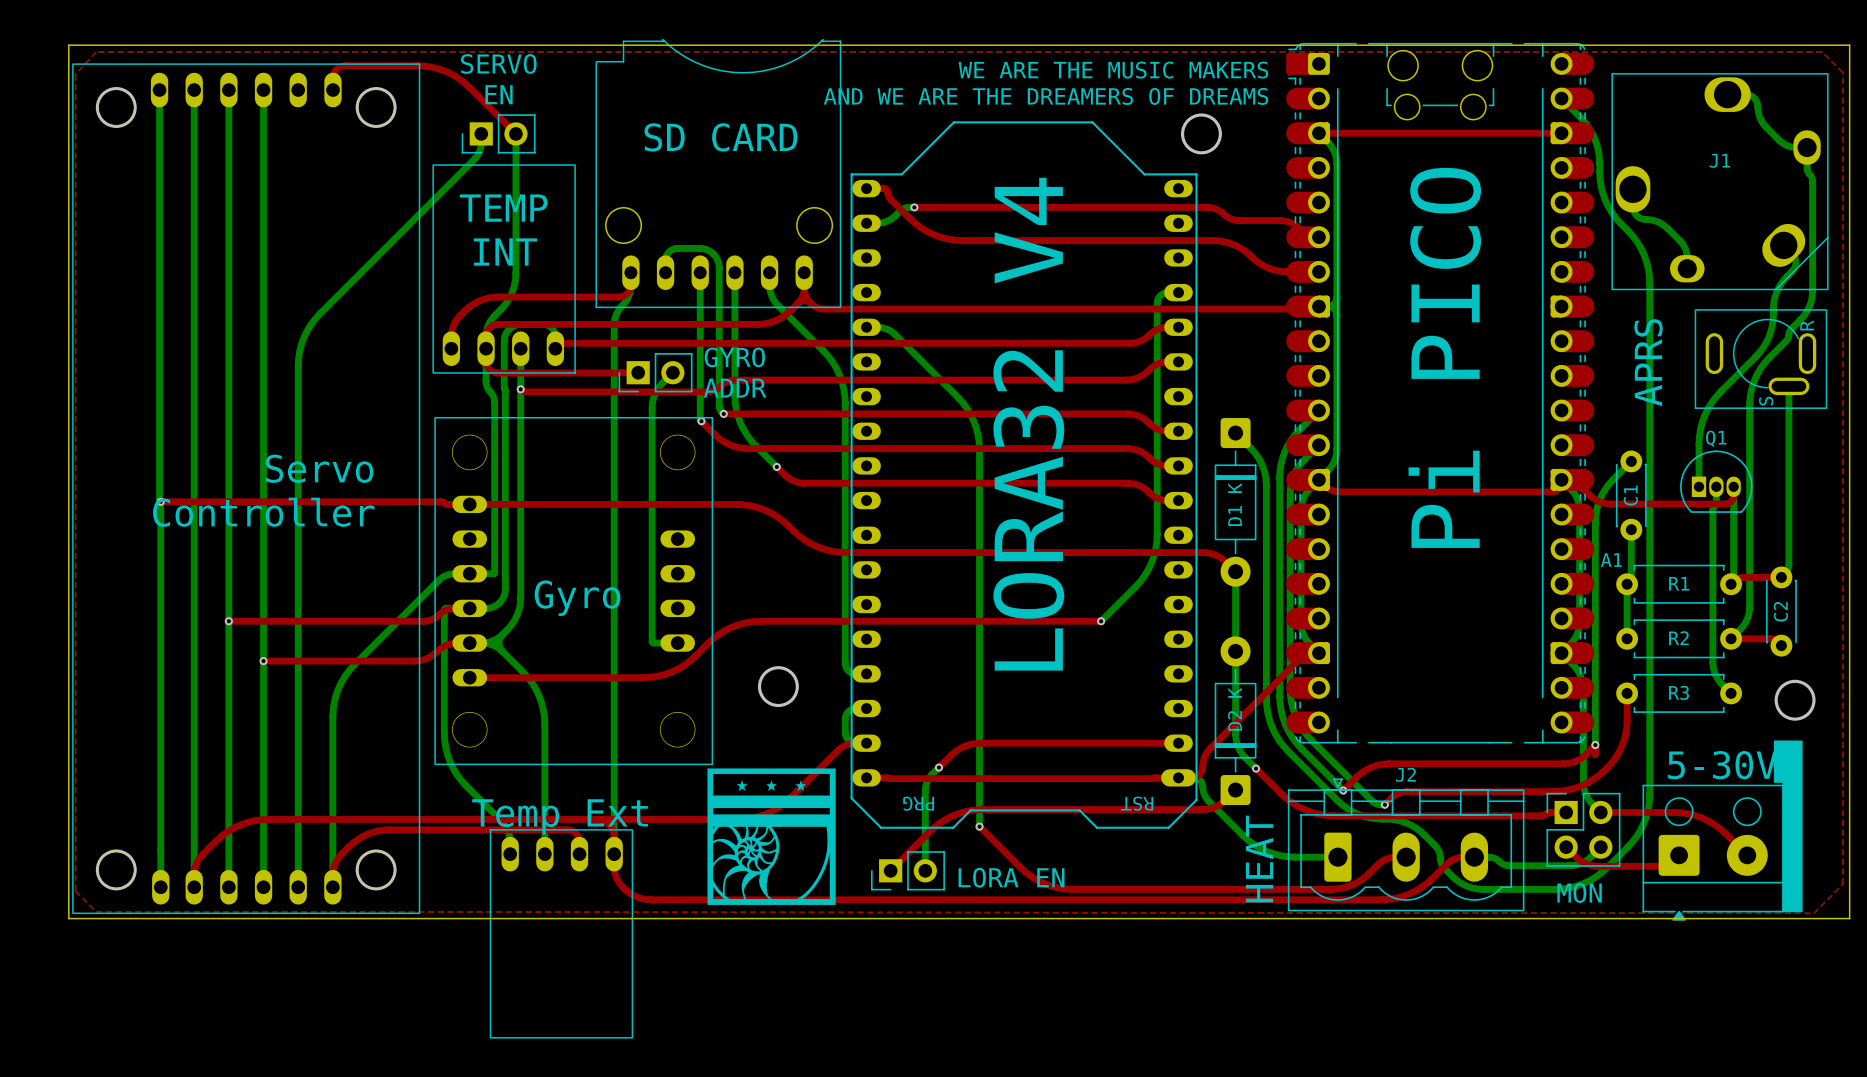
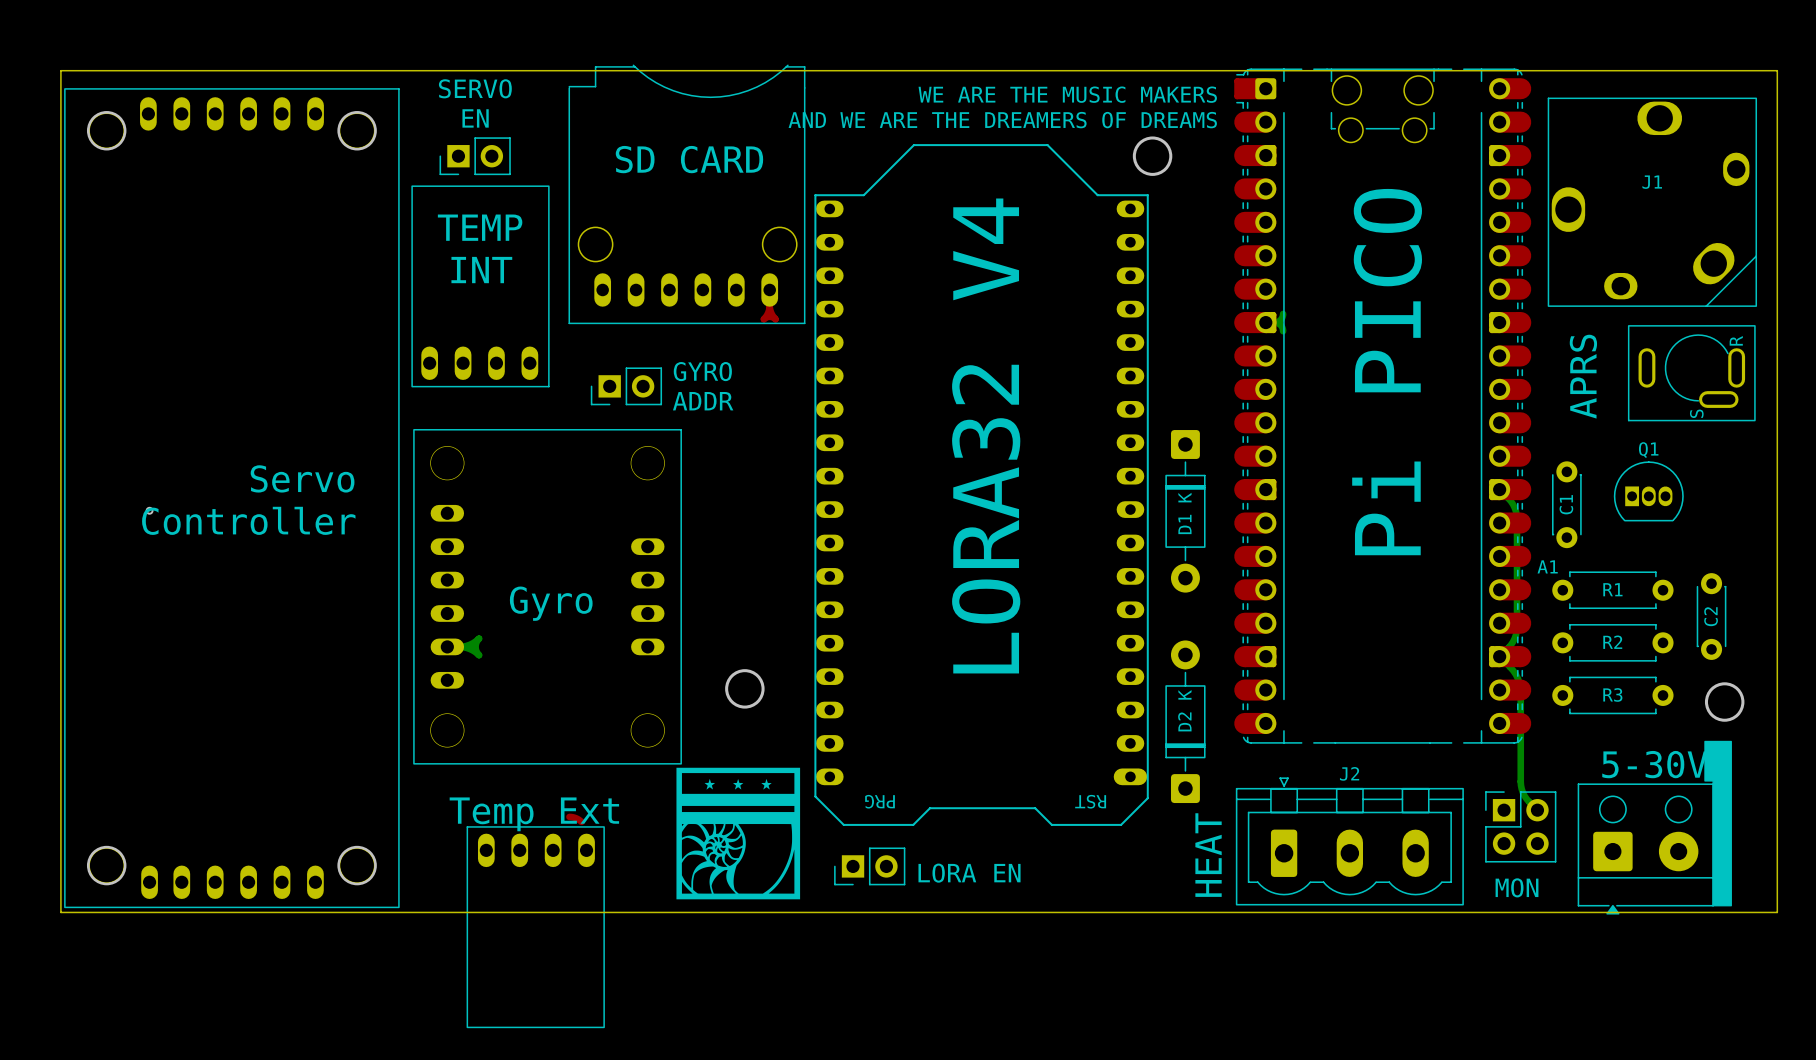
top zone outline: (96, 52) (1822, 52) (1842, 72) (1842, 884) (1813, 913) (96, 911) (75, 891) (75, 74) (96, 52) -> none
bottom track: (159, 90) (160, 887) -> none
bottom track: (194, 90) (194, 887) -> none
bottom track: (228, 90) (228, 887) -> none
bottom track: (263, 90) (263, 887) -> none
top track: (333, 90) (333, 73) (342, 66) (431, 67) (445, 71) (464, 82) (515, 133) -> none
bottom track: (1727, 94) (1752, 96) (1757, 102) (1762, 123) (1779, 140) (1790, 146) (1807, 147) (1807, 169) (1812, 181) (1811, 301) (1804, 315) (1790, 330) (1787, 339) (1760, 368) (1750, 392) (1749, 611) (1745, 622) (1731, 638) -> none
bottom track: (1561, 98) (1584, 122) (1592, 132) (1598, 150) (1600, 179) (1605, 200) (1612, 213) (1640, 248) (1649, 276) (1649, 801) (1646, 815) (1637, 835) (1601, 872) (1583, 883) (1562, 889) (1483, 889) (1466, 886) (1457, 880) (1443, 867) (1438, 849) (1420, 831) (1401, 821) (1369, 817) (1346, 808) (1283, 745) (1272, 727) (1266, 706) (1265, 478) (1259, 459) (1235, 433) -> none
bottom track: (481, 133) (480, 149) (476, 156) (319, 313) (306, 331) (299, 351) (298, 887) -> none
bottom track: (515, 133) (515, 280) (509, 298) (489, 322) (486, 336) (486, 383) (494, 402) (494, 572) (452, 573) (442, 577) (354, 664) (341, 682) (334, 702) (332, 717) (332, 887) -> none
top track: (1308, 133) (1572, 133) -> none
bottom track: (1318, 133) (1332, 148) (1336, 163) (1336, 453) (1330, 467) (1306, 493) (1301, 510) (1301, 625) (1306, 639) (1318, 653) -> none
top track: (866, 188) (885, 189) (889, 198) (915, 223) (927, 231) (948, 239) (1218, 240) (1238, 246) (1262, 265) (1274, 270) (1318, 271) -> none
bottom track: (1632, 189) (1634, 213) (1641, 218) (1661, 223) (1679, 240) (1686, 251) (1687, 268) -> none
top track: (914, 207) (1210, 207) (1236, 220) (1287, 221) (1295, 225) (1306, 235) (1318, 237) -> none
bottom track: (914, 207) (902, 208) (892, 217) (883, 222) (866, 223) -> none
via: (914, 207) -> none
bottom track: (1783, 245) (1794, 256) (1795, 264) (1776, 291) (1768, 337) (1759, 352) (1715, 397) (1702, 422) (1699, 436) (1699, 486) -> none
top track: (630, 272) (629, 289) (626, 294) (620, 296) (498, 297) (480, 300) (468, 307) (454, 322) (451, 333) (451, 348) -> none
bottom track: (630, 272) (629, 292) (617, 312) (614, 325) (614, 854) -> none
bottom track: (665, 272) (666, 256) (675, 248) (705, 249) (712, 252) (717, 260) (719, 406) (723, 413) -> none
bottom track: (700, 272) (701, 421) -> none
bottom track: (734, 272) (736, 409) (746, 435) (776, 466) -> none
bottom track: (769, 272) (770, 290) (774, 301) (828, 356) (839, 375) (843, 388) (845, 664) (851, 672) (866, 673) -> none
bottom track: (1178, 292) (1163, 293) (1157, 302) (1155, 548) (1151, 562) (1140, 581) (1101, 621) -> none
top track: (798, 303) (780, 318) (763, 324) (498, 324) (490, 327) (486, 333) (486, 363) (489, 369) (495, 372) (638, 372) -> none
top track: (810, 303) (816, 307) (824, 309) (1303, 309) (1308, 306) (1318, 306) -> none
bottom track: (866, 327) (884, 328) (895, 334) (962, 402) (970, 414) (978, 435) (979, 826) -> none
top track: (1178, 327) (1160, 328) (1140, 341) (1129, 343) (564, 343) (555, 348) -> none
bottom track: (520, 348) (520, 597) (517, 614) (502, 634) -> none
bottom track: (555, 348) (554, 332) (545, 324) (517, 324) (510, 328) (505, 334) (504, 594) (499, 602) (491, 607) (446, 608) (444, 610) (444, 733) (447, 754) (461, 780) (506, 827) (509, 838) (510, 854) -> none
top track: (1178, 361) (1160, 363) (1141, 375) (1126, 380) (735, 380) (727, 381) (716, 389) (706, 391) (525, 391) (520, 389) -> none
bottom track: (672, 372) (658, 388) (652, 404) (652, 640) (654, 643) (677, 643) -> none
bottom track: (1788, 386) (1788, 564) (1787, 571) (1781, 577) -> none
via: (520, 389) -> none
bottom track: (1318, 410) (1290, 440) (1284, 451) (1280, 470) (1280, 703) (1282, 717) (1292, 737) (1343, 790) -> none
top track: (723, 413) (1127, 413) (1142, 417) (1160, 430) (1178, 431) -> none
via: (723, 413) -> none
top track: (701, 421) (724, 442) (742, 448) (1127, 448) (1142, 452) (1160, 464) (1178, 465) -> none
via: (701, 421) -> none
bottom track: (1318, 445) (1298, 467) (1290, 489) (1291, 702) (1298, 723) (1311, 740) (1373, 802) (1384, 804) -> none
bottom track: (1631, 461) (1605, 488) (1598, 504) (1595, 516) (1595, 754) -> none
top track: (776, 466) (790, 479) (801, 482) (1127, 483) (1142, 487) (1160, 499) (1178, 500) -> none
via: (776, 466) -> none
top track: (1308, 479) (1318, 480) (1329, 489) (1339, 491) (1551, 491) (1559, 488) -> none
top track: (1564, 486) (1579, 488) (1595, 499) (1610, 504) (1726, 503) (1733, 498) (1733, 486) -> none
bottom track: (1716, 486) (1716, 502) (1712, 509) (1713, 665) (1718, 679) (1731, 693) -> none
bottom track: (1733, 486) (1733, 579) (1731, 584) -> none
top track: (160, 501) (743, 504) (771, 513) (810, 543) (838, 552) (1202, 552) (1218, 556) (1235, 571) -> none
bottom track: (1631, 529) (1631, 577) (1627, 587) (1627, 638) -> none
bottom track: (1235, 571) (1235, 737) (1241, 753) (1256, 768) -> none
top track: (1781, 577) (1741, 577) (1731, 584) -> none
top track: (469, 608) (448, 609) (431, 619) (423, 621) (228, 621) -> none
via: (228, 621) -> none
top track: (1101, 621) (753, 621) (726, 630) (713, 638) (684, 665) (657, 676) (469, 677) -> none
via: (1101, 621) -> none
top track: (1731, 638) (1770, 638) (1781, 645) -> none
top track: (469, 643) (449, 644) (430, 656) (418, 660) (263, 661) -> none
bottom track: (502, 651) (532, 683) (543, 710) (544, 854) -> none
top track: (1318, 653) (1304, 653) (1210, 748) (1204, 756) (1201, 772) (1194, 777) (866, 777) -> none
via: (263, 661) -> none
top track: (1627, 693) (1626, 727) (1619, 751) (1599, 774) (1581, 785) (1552, 791) (1405, 791) (1394, 795) (1384, 804) -> none
bottom track: (866, 708) (851, 709) (846, 713) (845, 719) (845, 733) (847, 739) (853, 742) (866, 743) -> none
top track: (866, 743) (850, 743) (841, 747) (785, 802) (766, 813) (745, 819) (253, 820) (227, 831) (200, 856) (194, 869) (194, 887) -> none
top track: (1178, 743) (976, 743) (957, 750) (938, 767) -> none
via: (1595, 745) -> none
top track: (1595, 754) (1595, 745) (1579, 759) (1567, 763) (1384, 764) (1363, 771) (1343, 790) -> none
bottom track: (938, 767) (929, 777) (925, 788) (925, 870) -> none
via: (938, 767) -> none
top track: (1256, 768) (1292, 803) (1305, 810) (1326, 815) (1541, 815) (1549, 812) (1566, 812) -> none
via: (1256, 768) -> none
bottom track: (1178, 777) (1199, 779) (1207, 800) (1242, 835) (1260, 848) (1288, 856) (1337, 857) -> none
top track: (1235, 790) (1218, 805) (1206, 809) (968, 811) (947, 818) (935, 826) (890, 870) -> none
via: (1343, 790) -> none
via: (1384, 804) -> none
top track: (1600, 812) (1674, 812) (1695, 815) (1720, 829) (1747, 855) -> none
top track: (611, 819) (608, 822) (614, 834) (614, 869) (617, 880) (632, 894) (650, 899) (1388, 899) (1408, 894) (1421, 887) (1452, 860) (1461, 857) (1474, 857) -> none
top track: (979, 826) (1031, 876) (1051, 886) (1065, 889) (1335, 889) (1356, 882) (1386, 859) (1406, 857) -> none
via: (979, 826) -> none
top track: (1566, 847) (1580, 860) (1595, 866) (1662, 866) (1669, 863) (1679, 855) -> none
bottom track: (1600, 847) (1584, 861) (1573, 865) (1507, 865) (1492, 857) (1474, 857) -> none
top track: (579, 854) (578, 836) (568, 829) (383, 830) (362, 836) (339, 856) (333, 869) (332, 887) -> none

